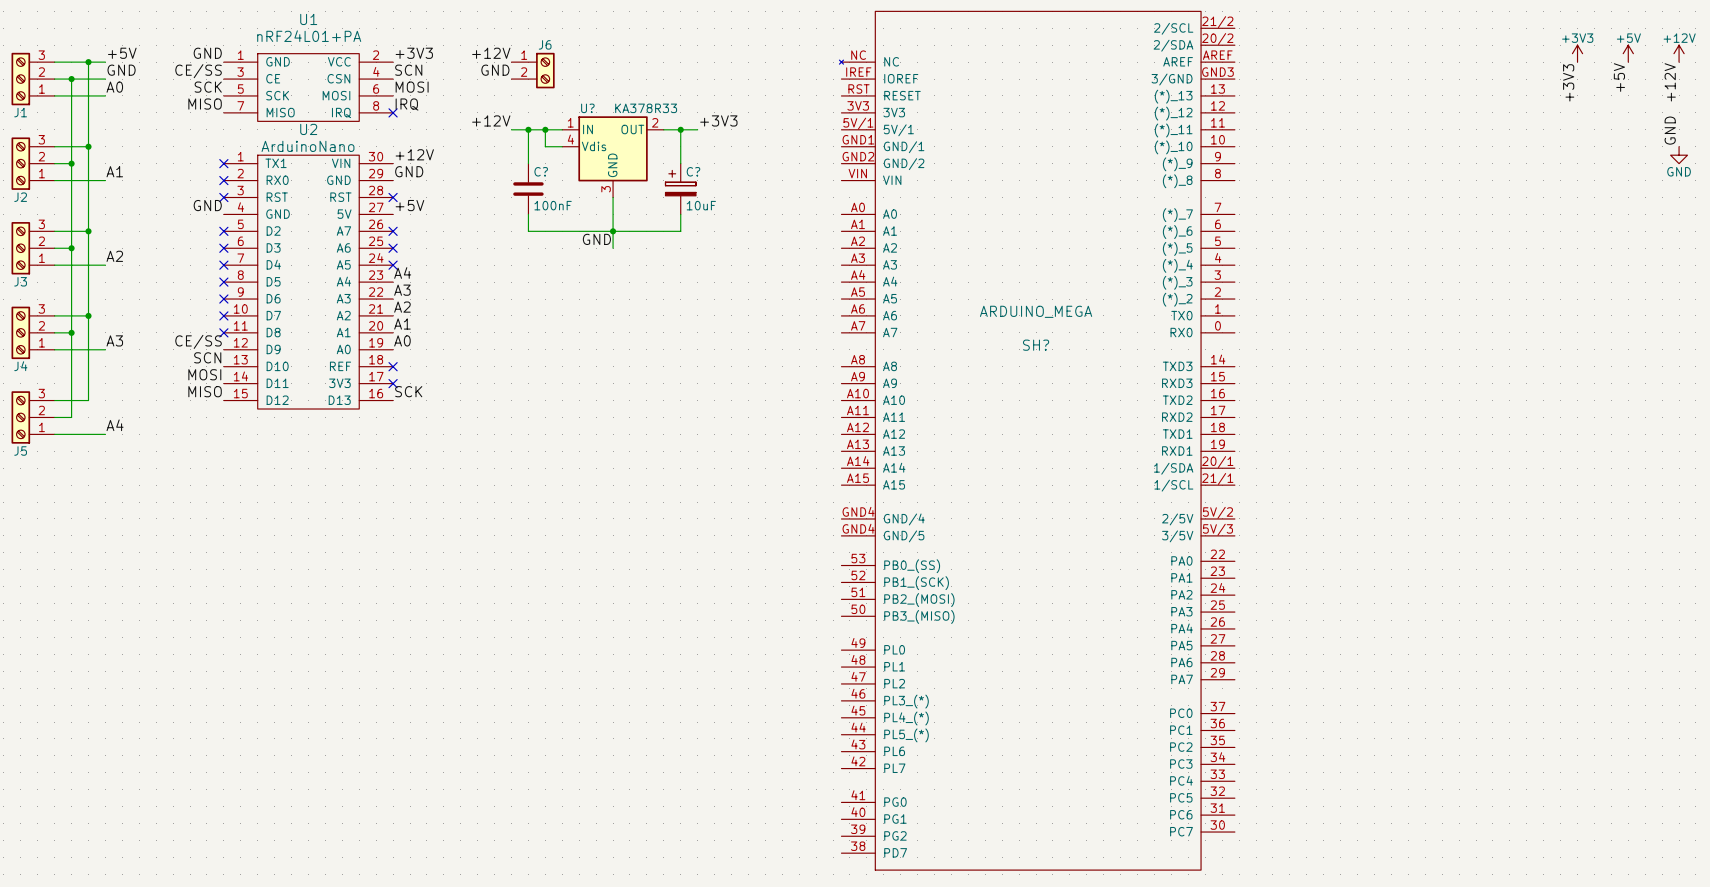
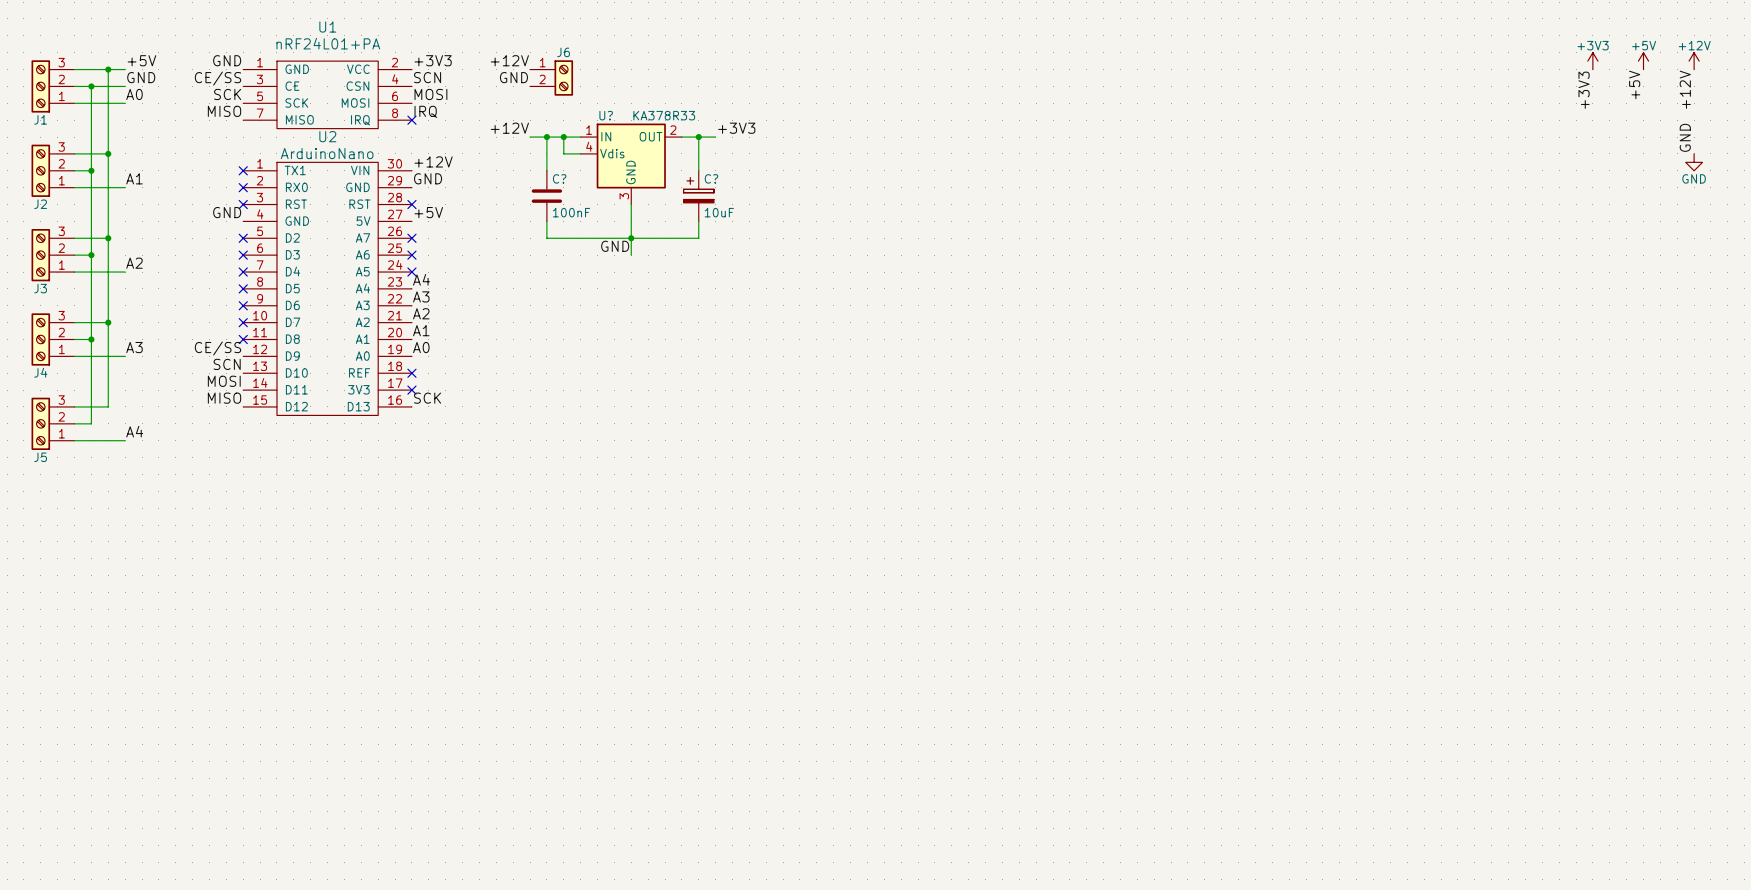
SH?: ARDUINO_MEGA (1037, 440) -> none

